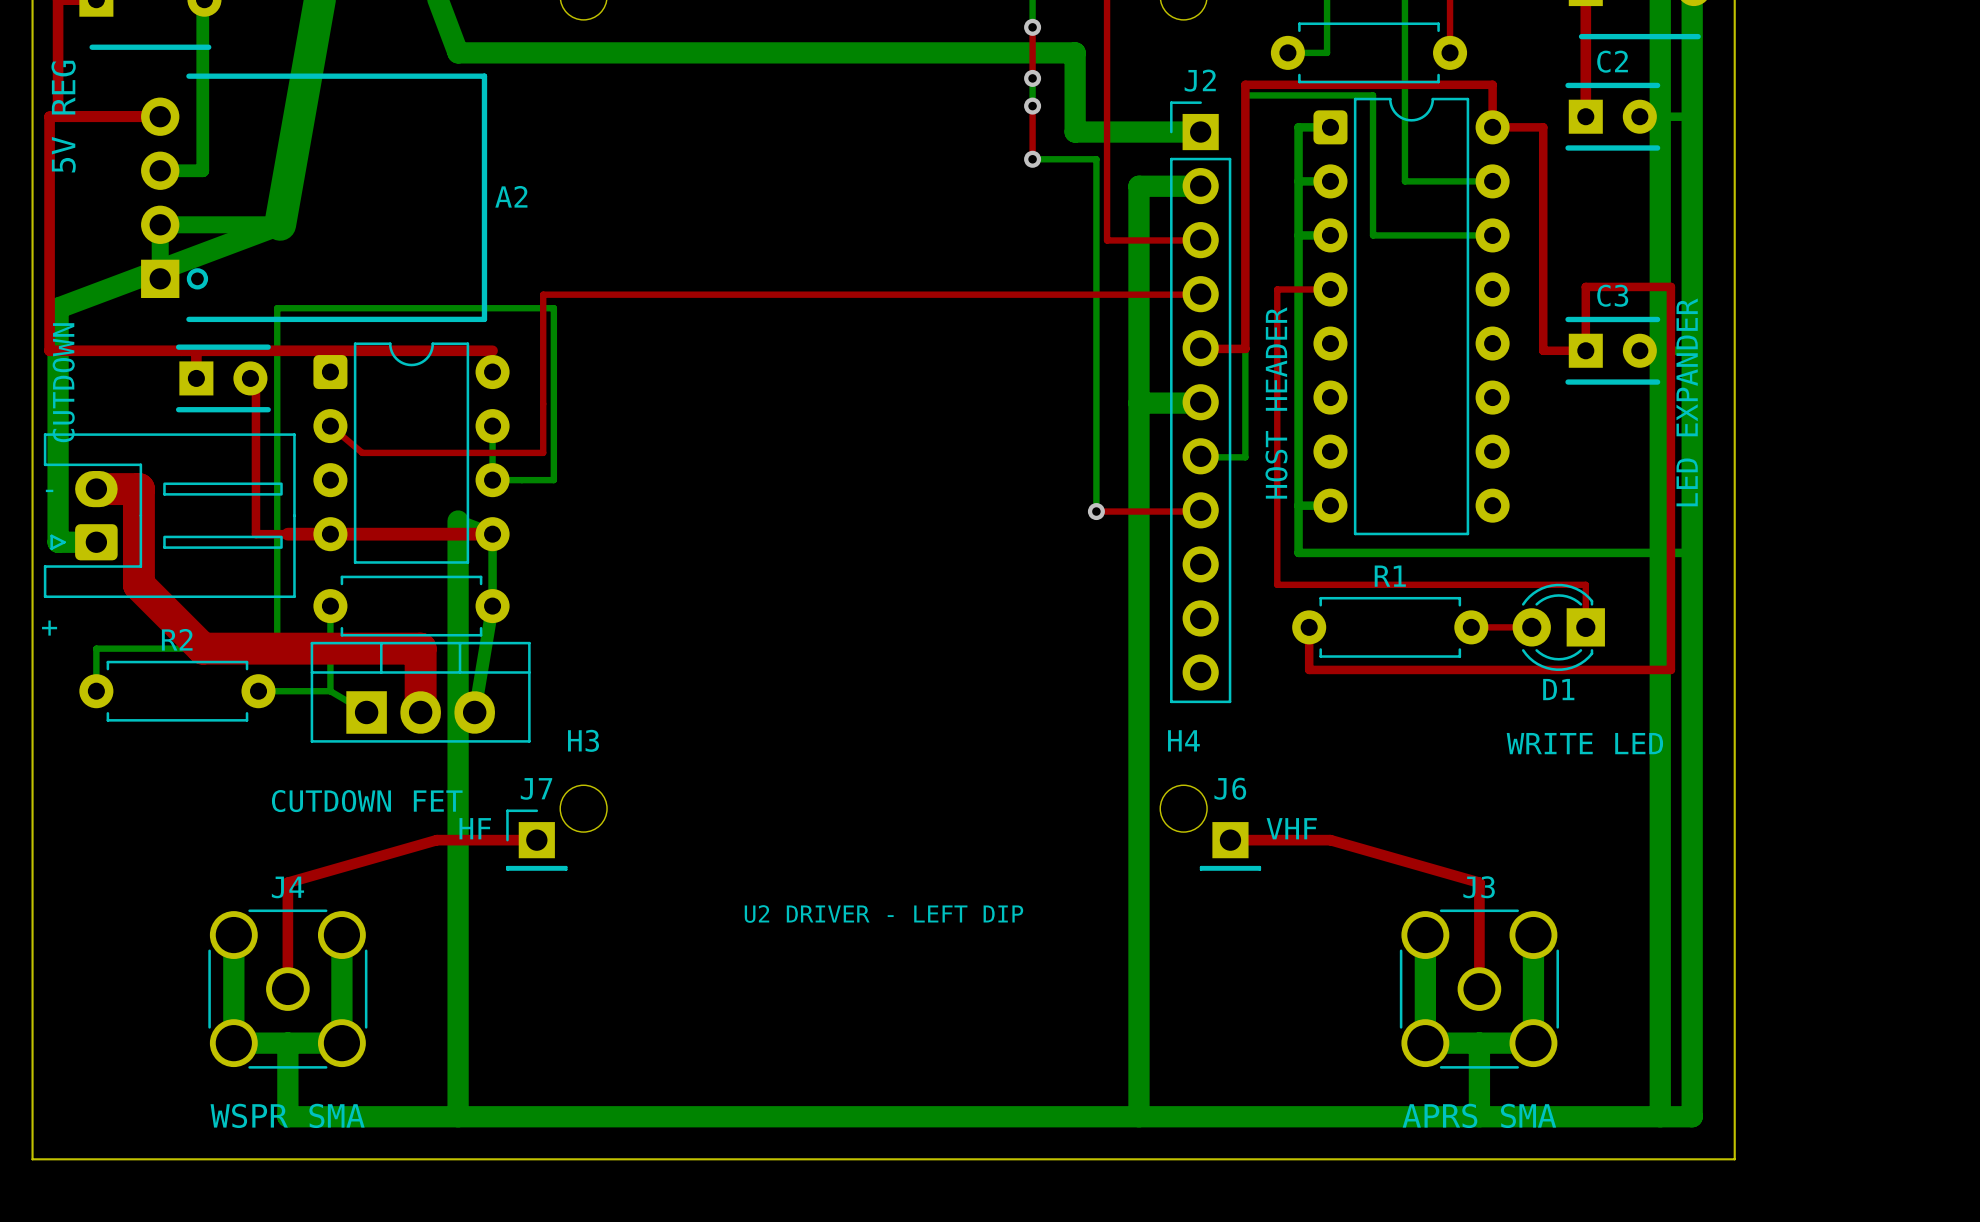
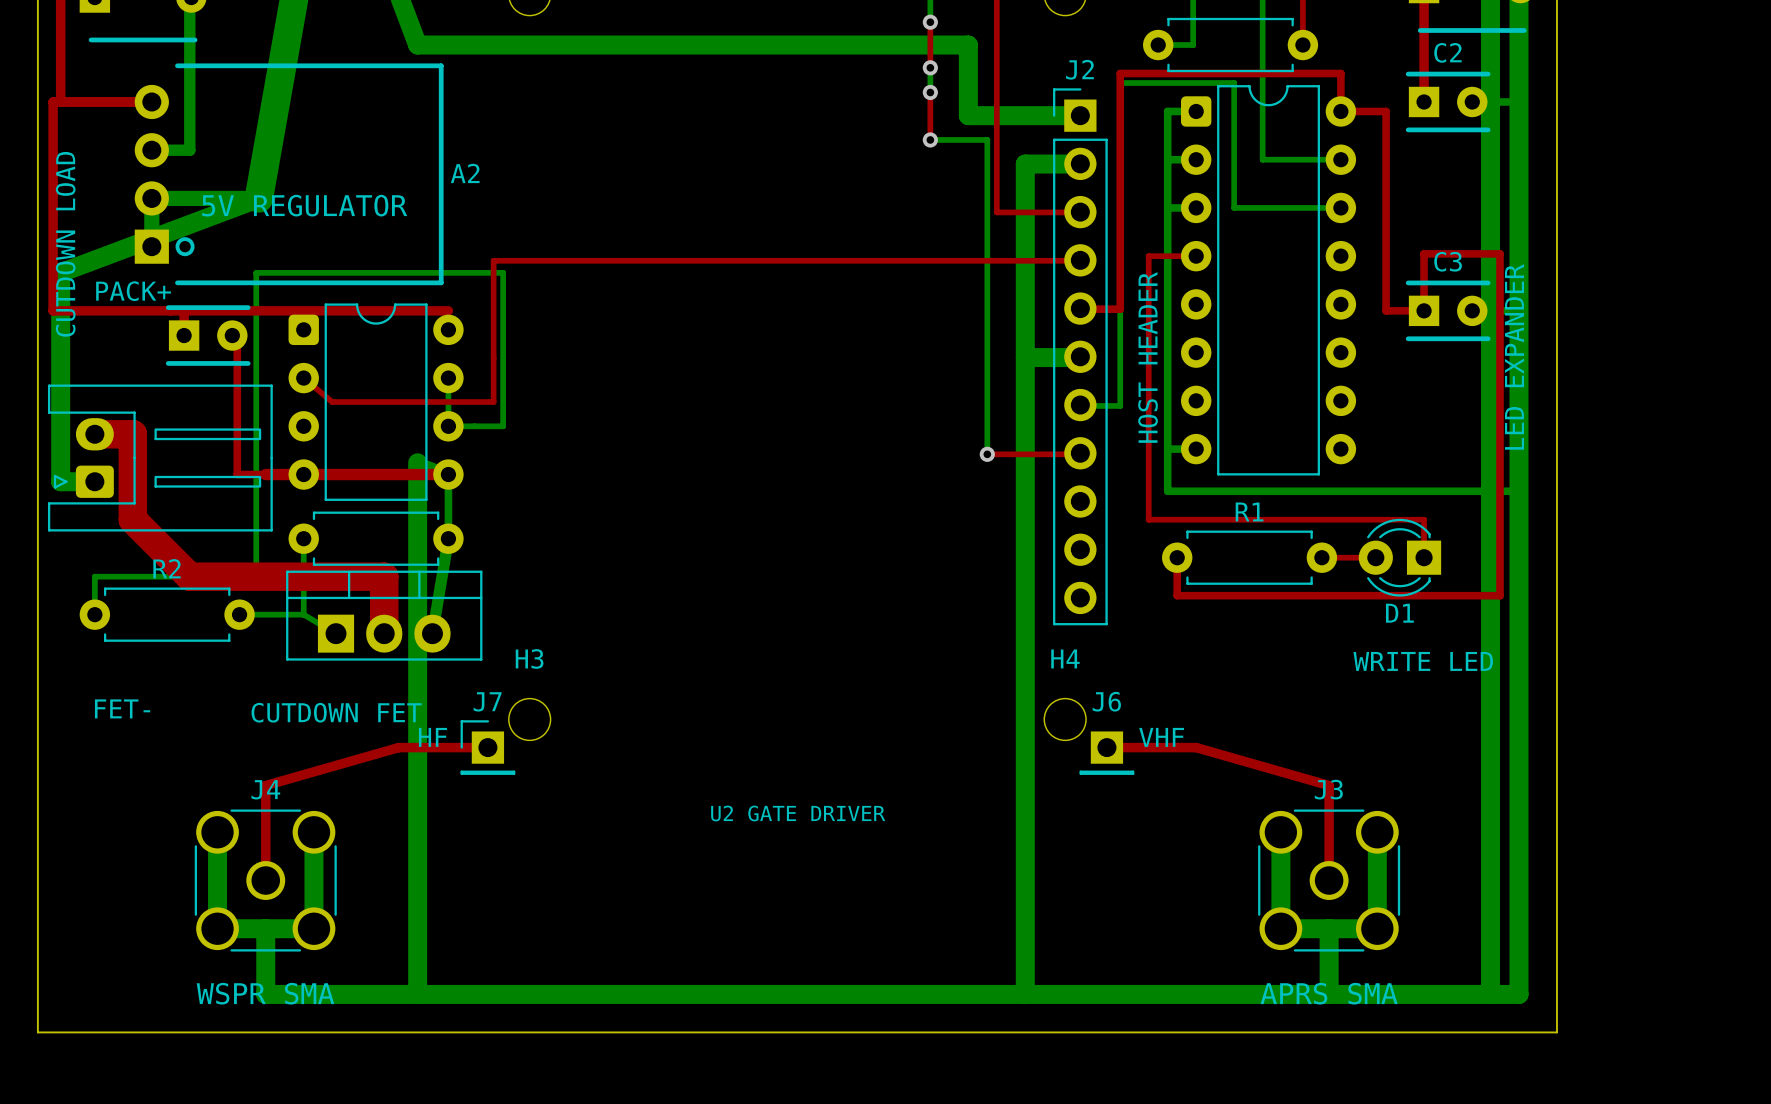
text: 5V REG (63, 116) -> none
text: none -> 5V REGULATOR (304, 205)
text: none -> PACK+ (133, 291)
text: CUTDOWN (63, 382) -> CUTDOWN LOAD (65, 244)
text: - (49, 490) -> none
text: + (49, 628) -> none
text: none -> FET- (122, 708)
text: U2 DRIVER - LEFT DIP (883, 913) -> U2 GATE DRIVER (798, 813)

